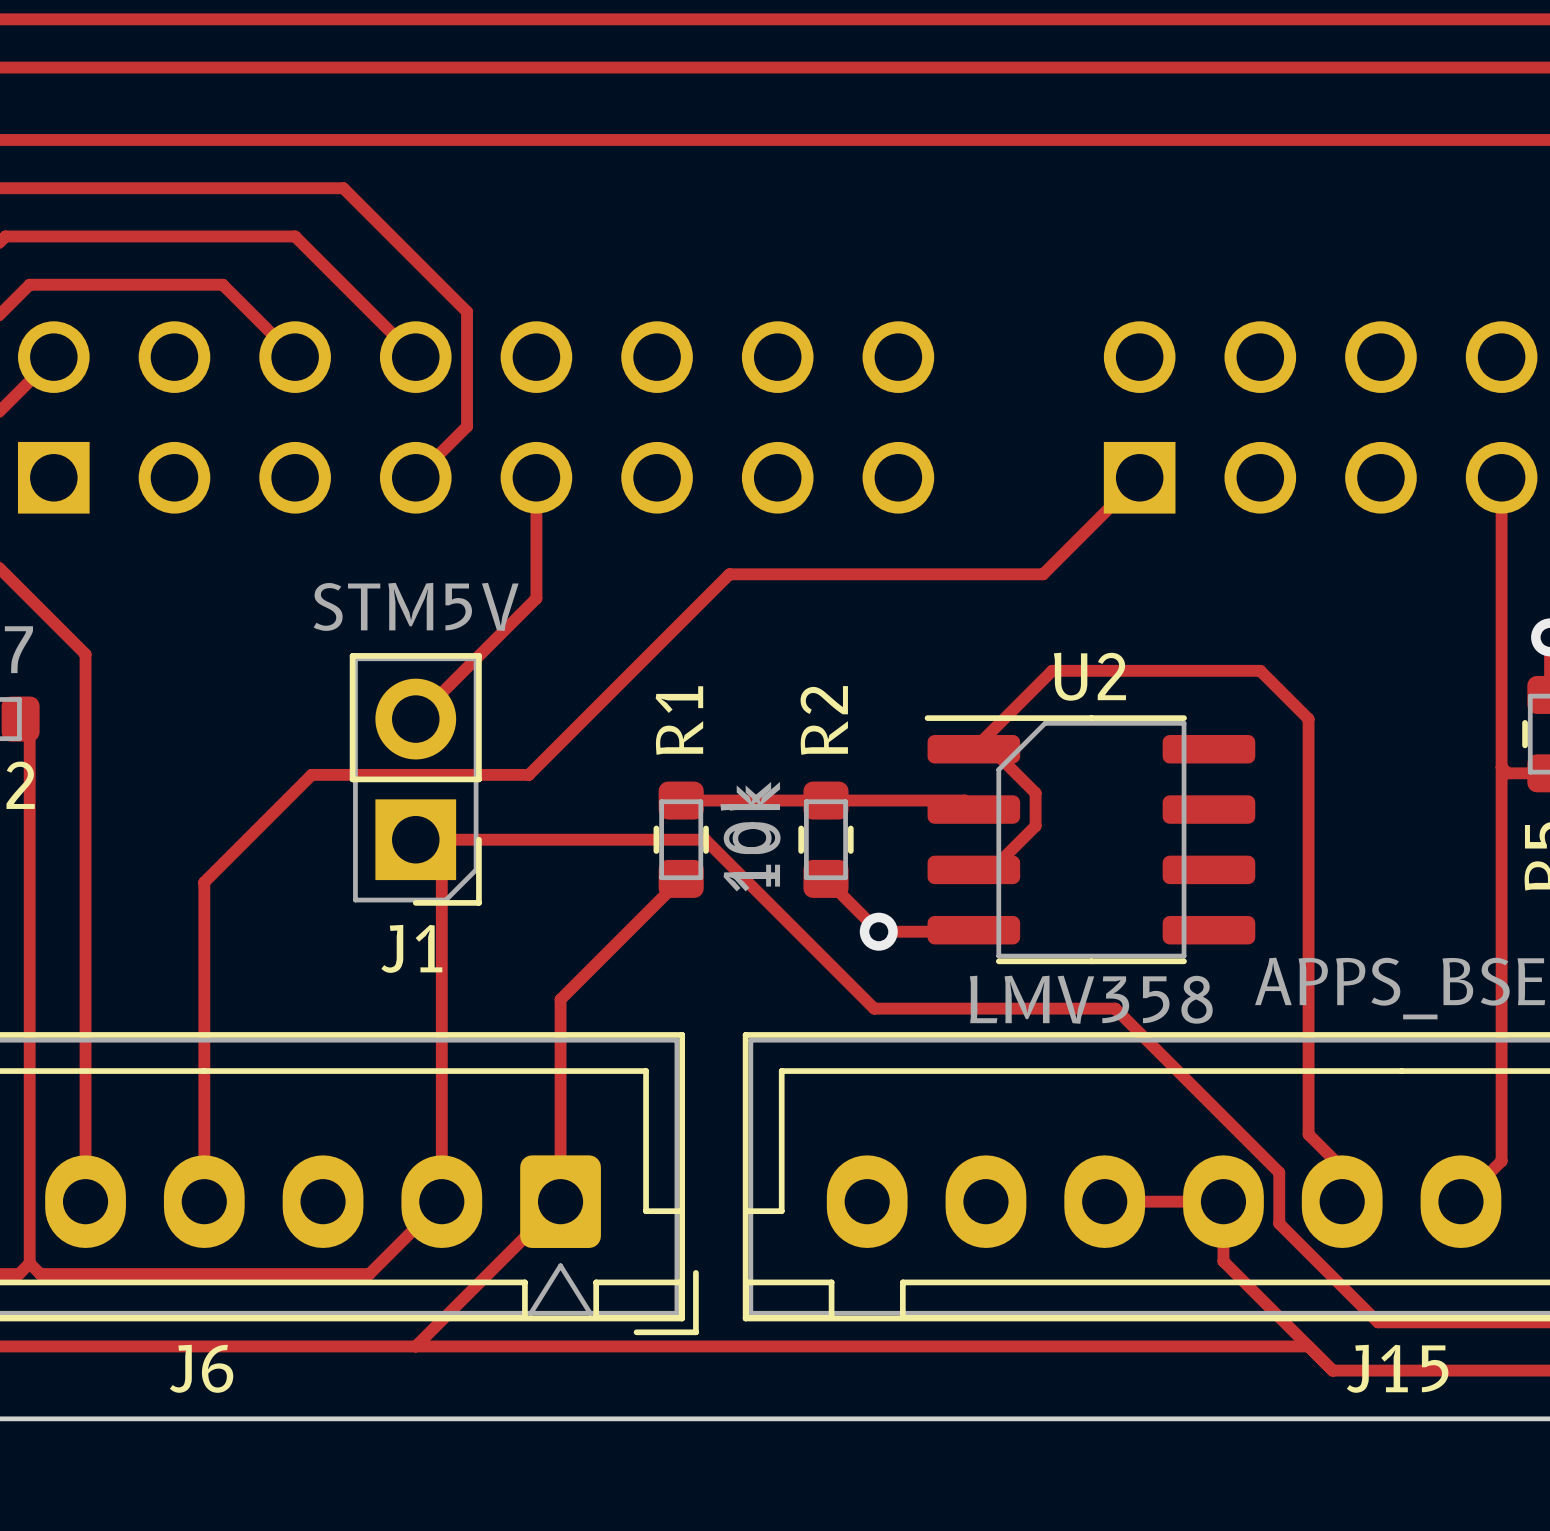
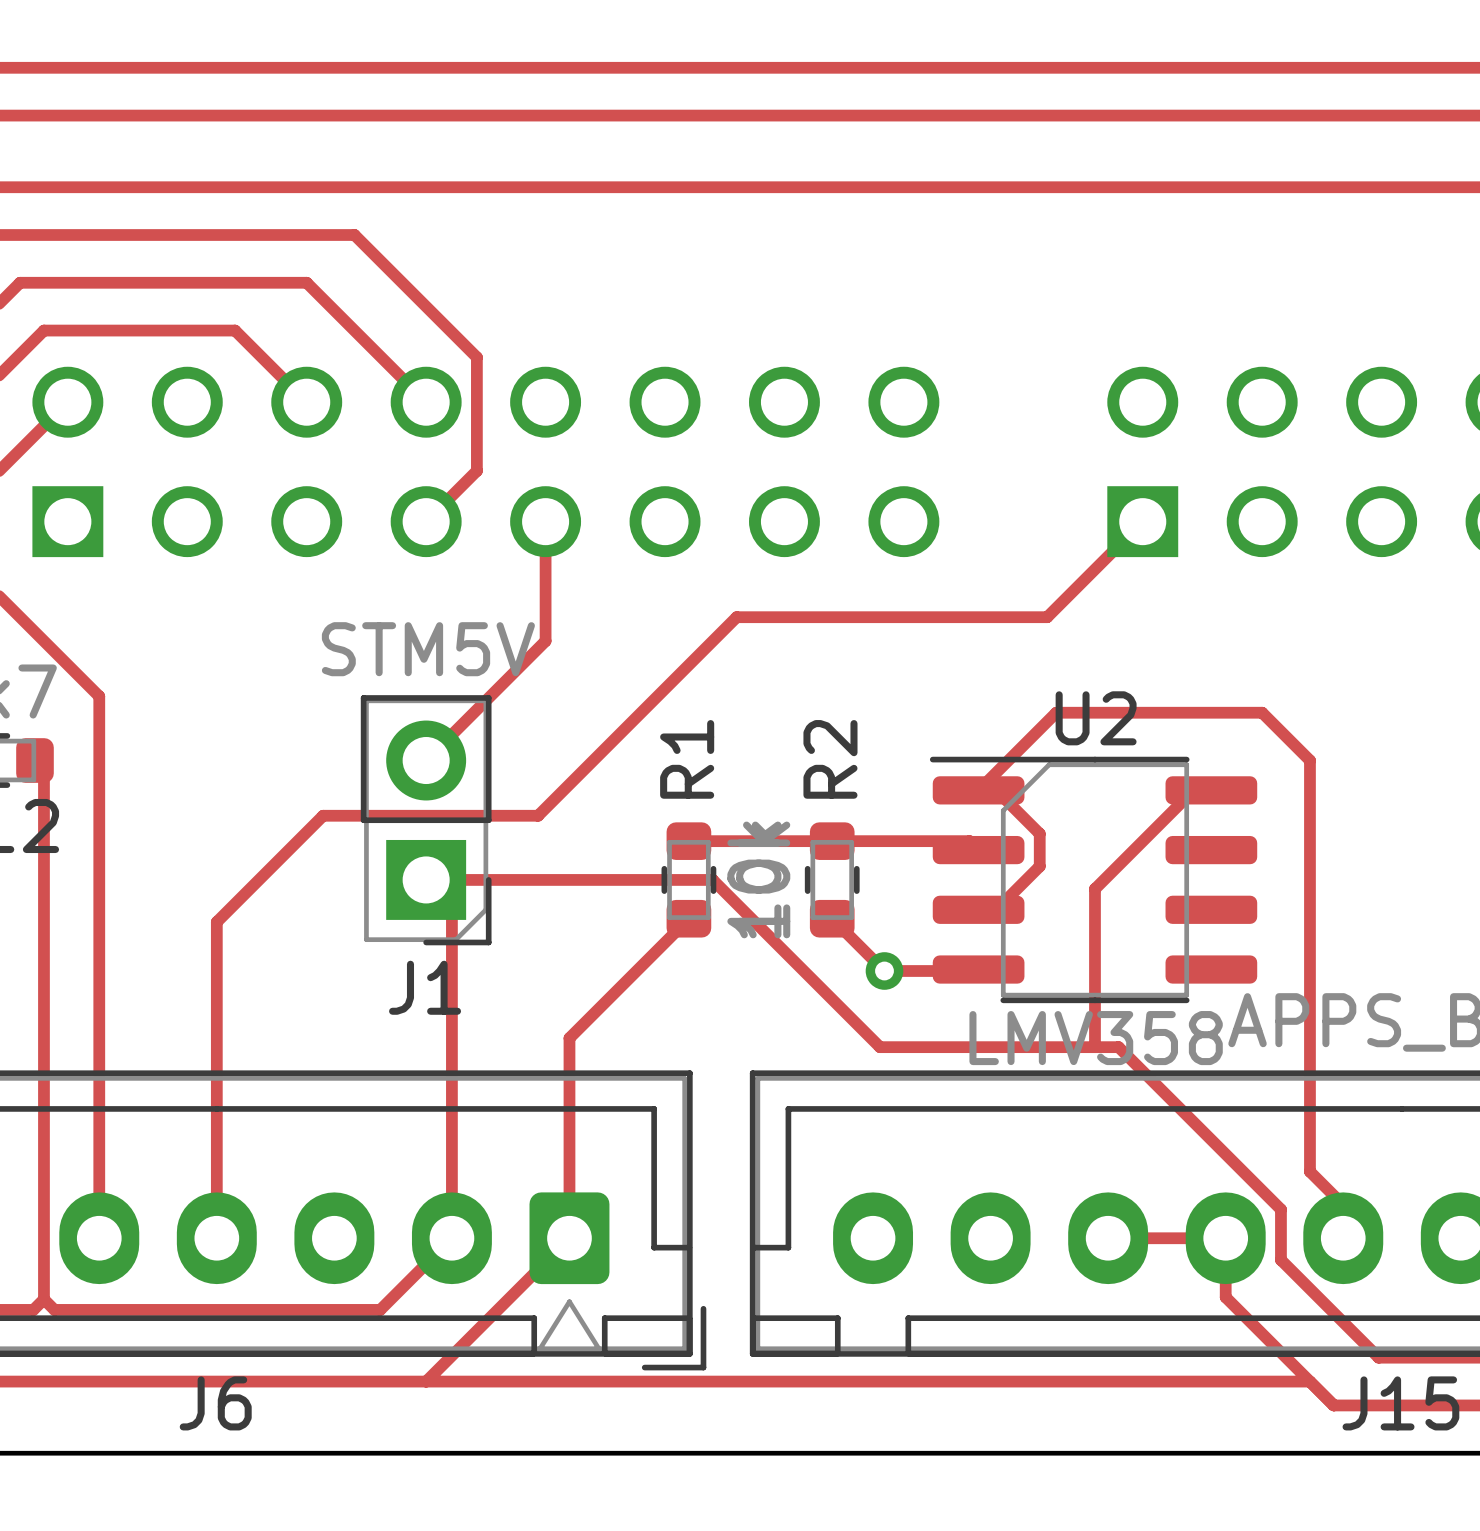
track: none -> (1211, 790) (1193, 790) (1094, 889) (1094, 1047)

